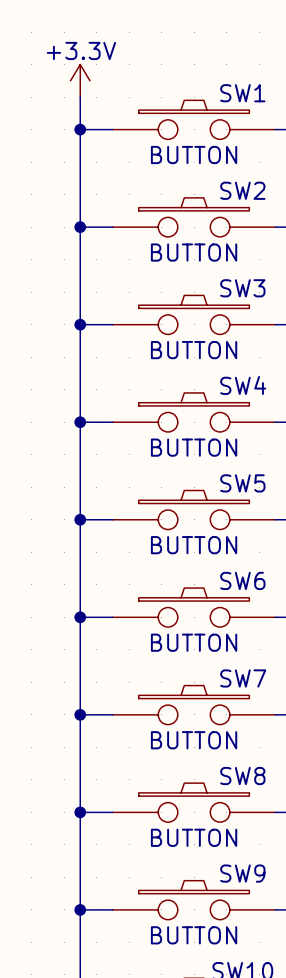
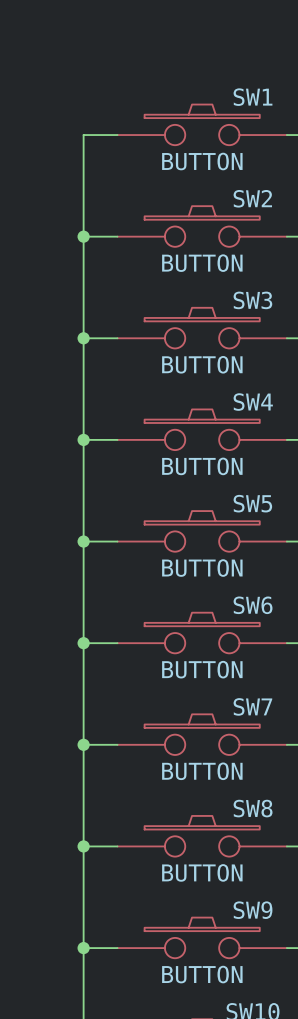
power symbol: +3.3V (80, 80) -> none
wire: (80, 97) (80, 129) -> none
junction: (80, 129) -> none

